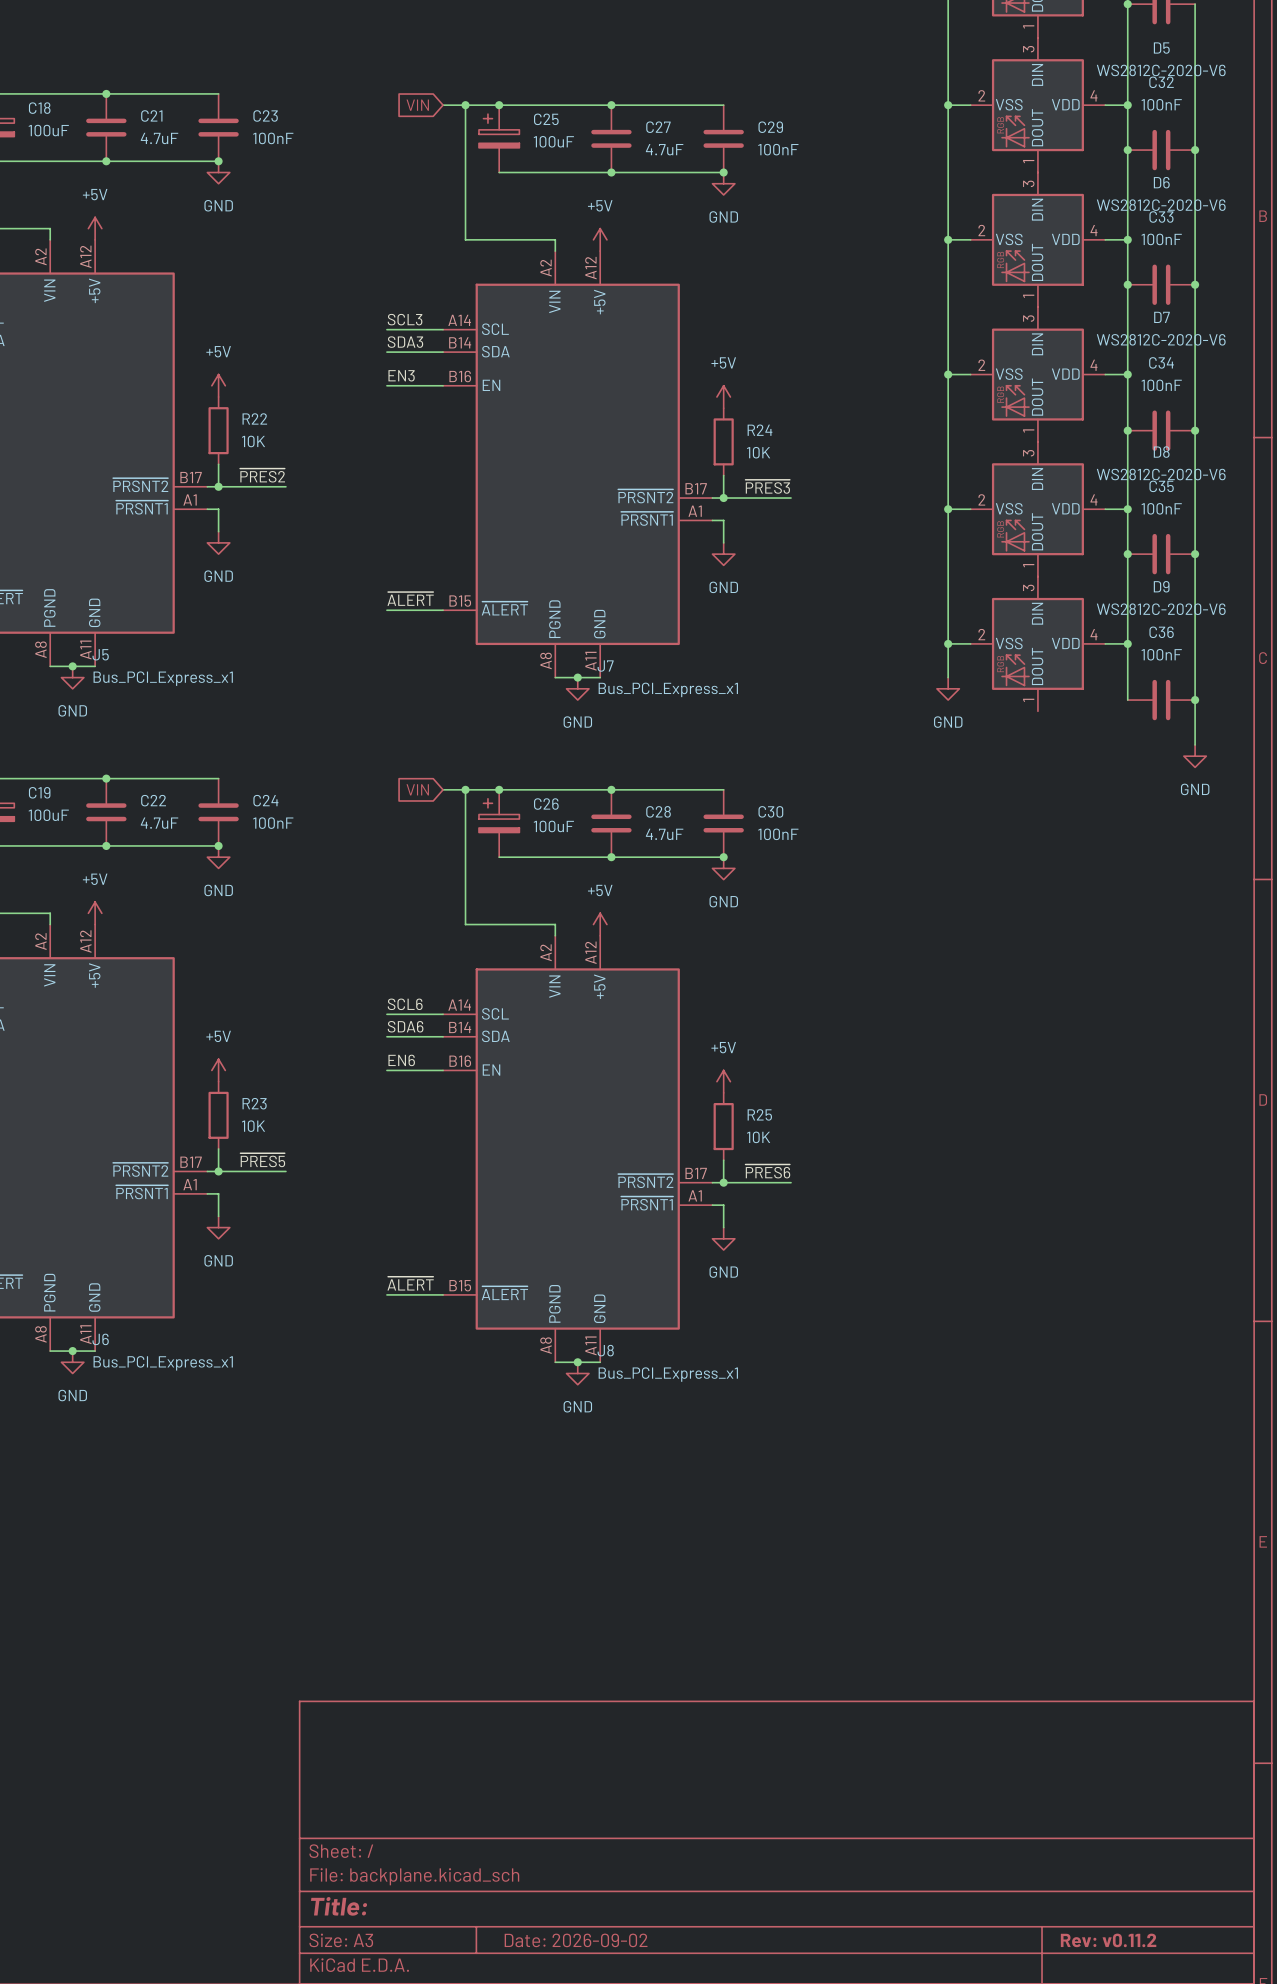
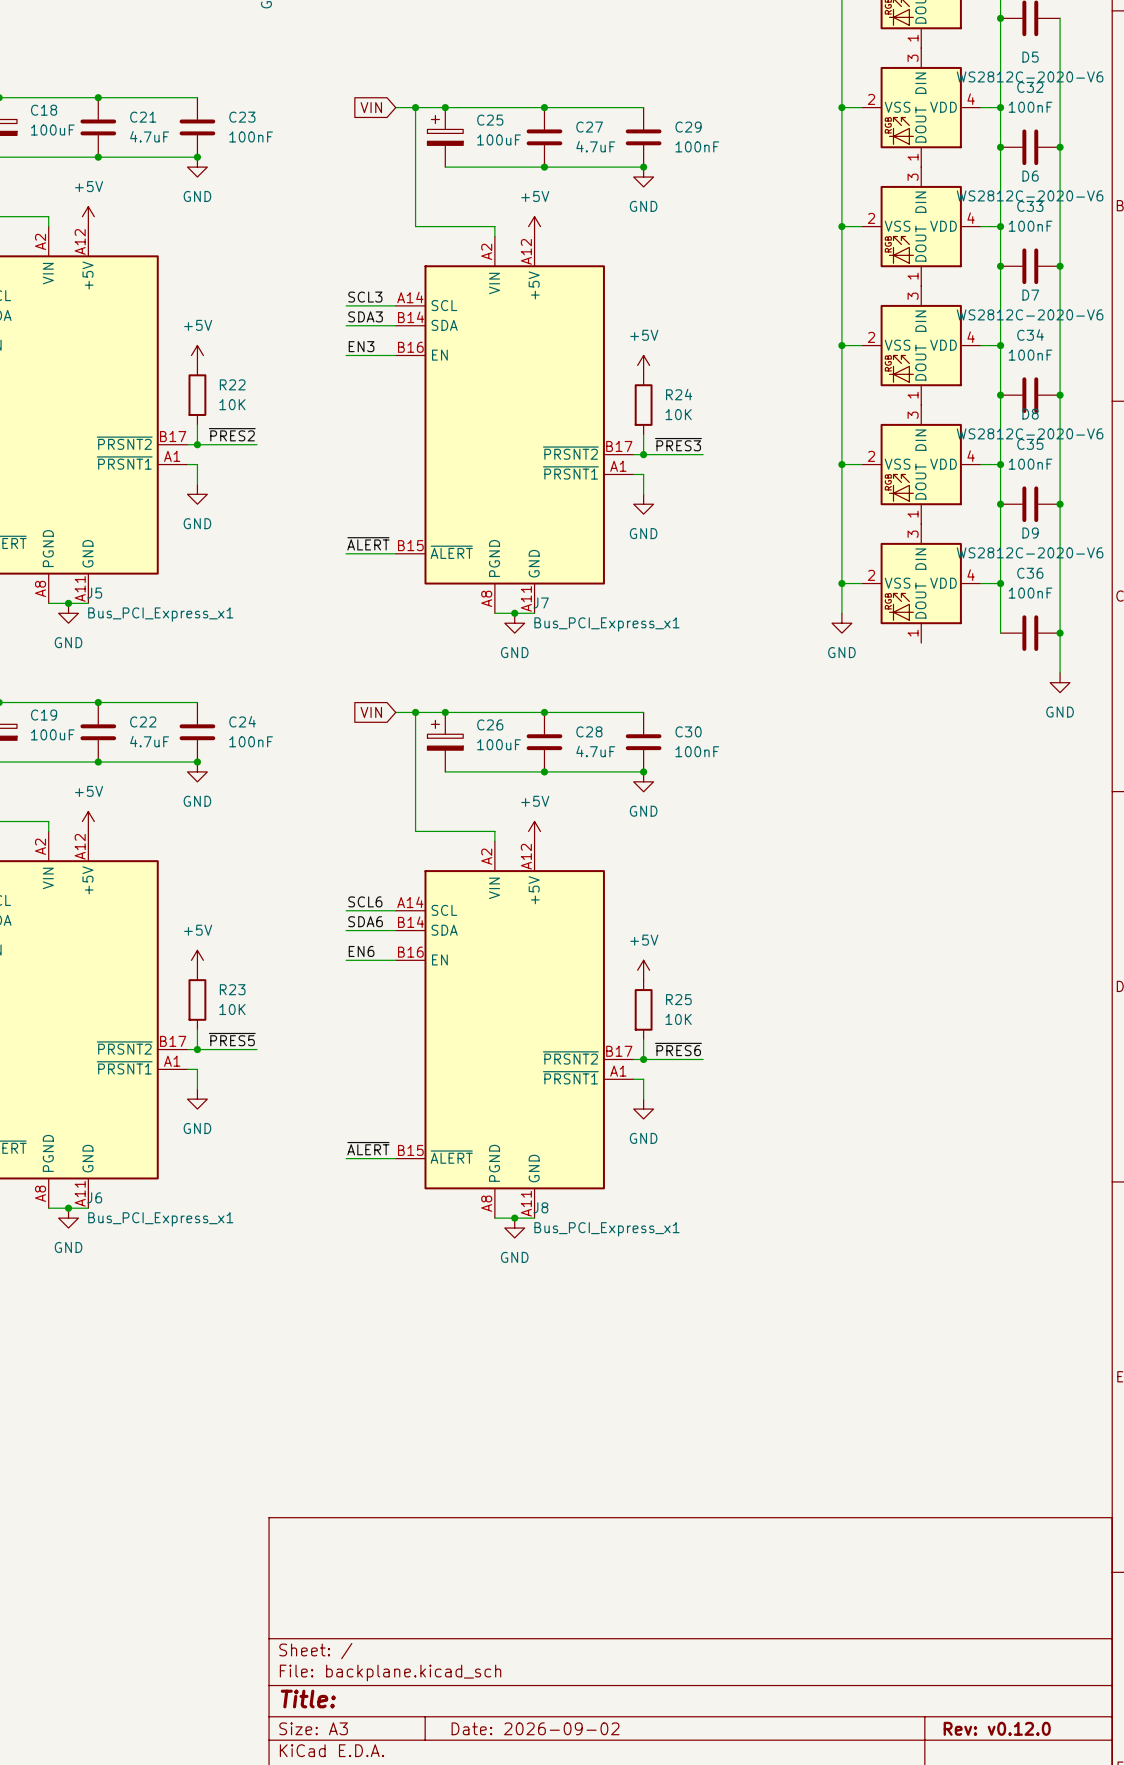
title block: Rev: v0.11.2 (1108, 1940) -> Rev: v0.12.0 (997, 1728)

